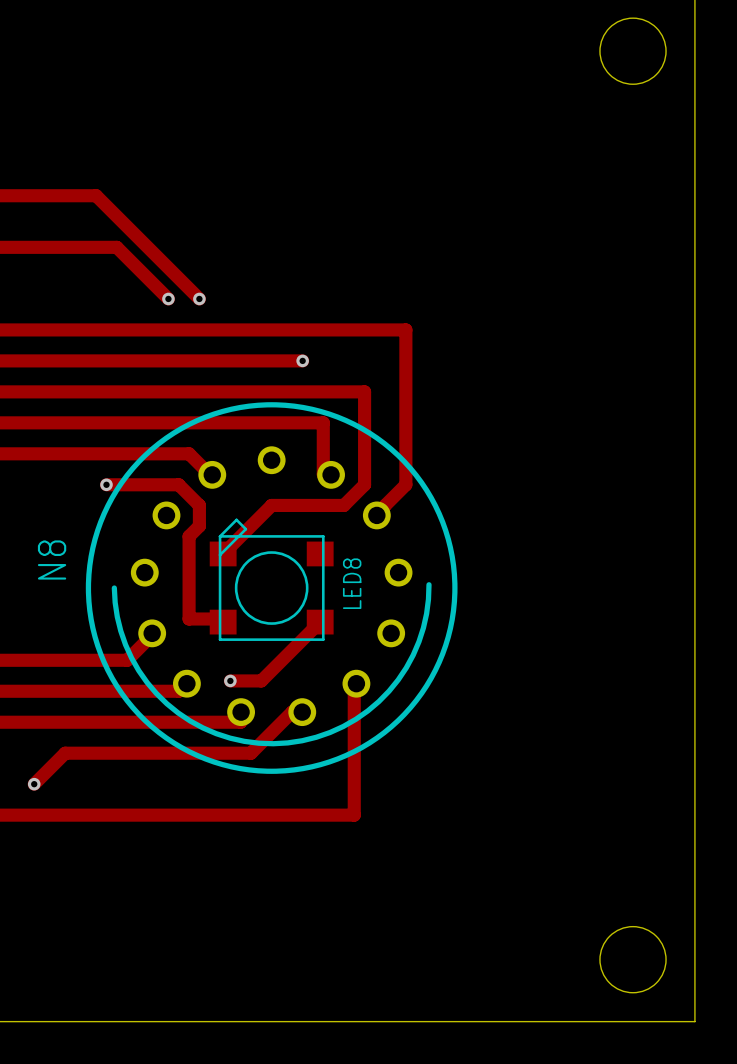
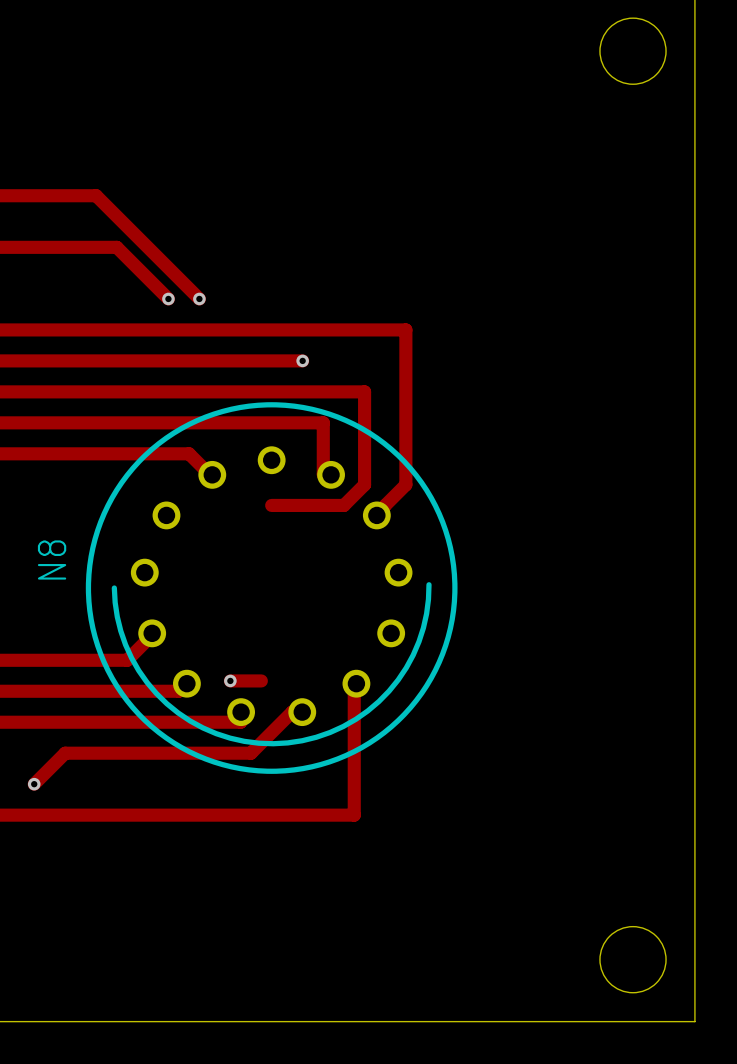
track: (106, 484) (178, 484) (199, 505) (199, 526) (189, 536) (189, 619) (220, 619) (223, 622) -> none
via: (106, 484) -> none
track: (271, 505) (223, 553) -> none
LED8: (271, 579) -> none
track: (320, 622) (261, 680) -> none

